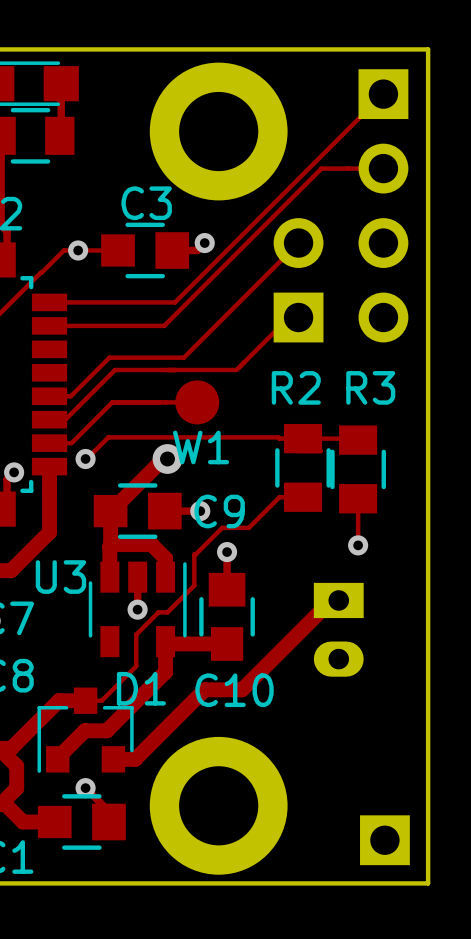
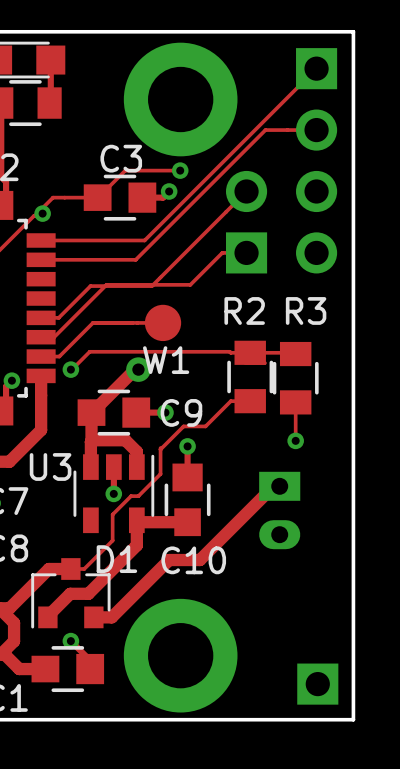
track: none -> (180, 170) (125, 170) (97, 197)
via: none -> (180, 170)
via position: (78, 250) -> (42, 213)
track: (287, 319) (236, 370) (115, 370) -> (246, 252) (222, 252) (190, 284) (106, 284) (95, 296)

